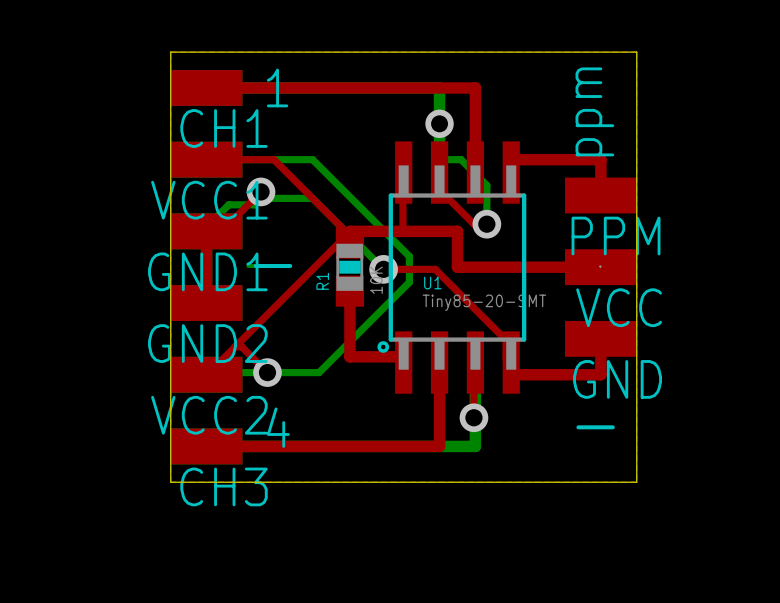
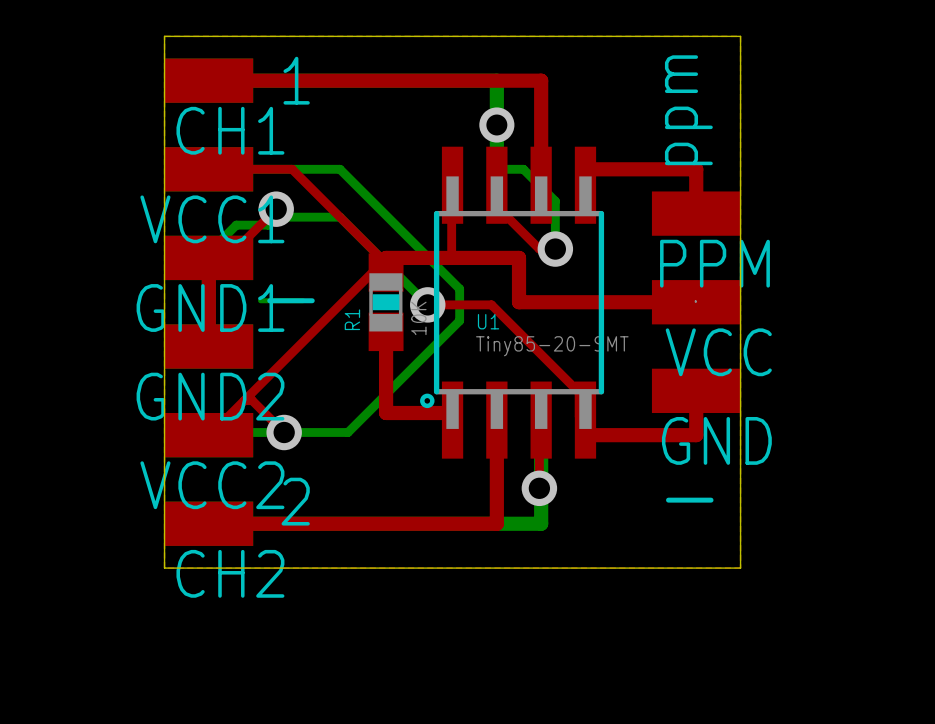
text: 4 (278, 427) -> 2 (295, 501)
CH3 name: CH3 (224, 486) -> CH2 (230, 573)

